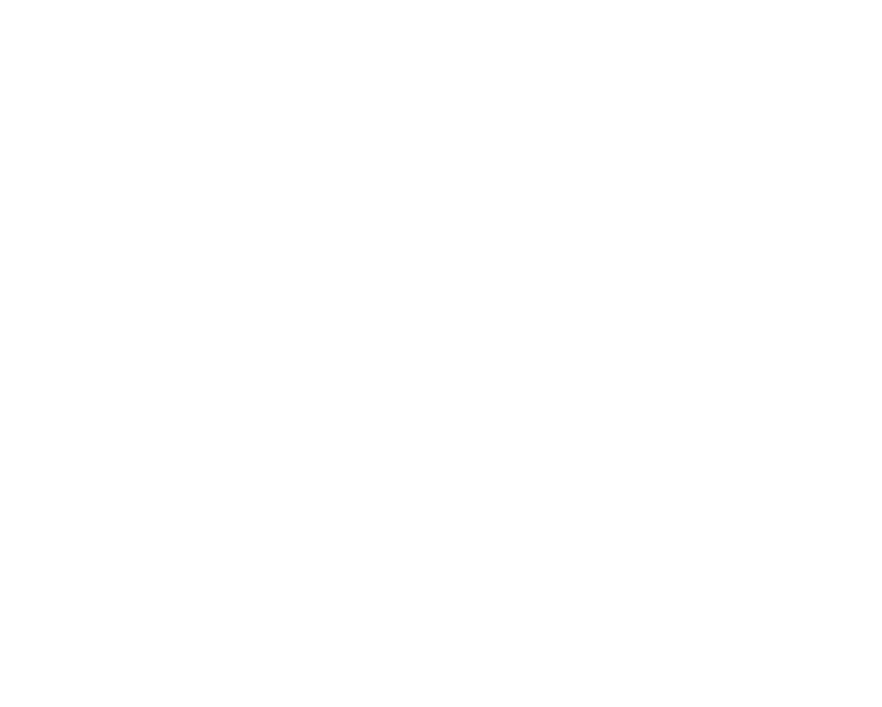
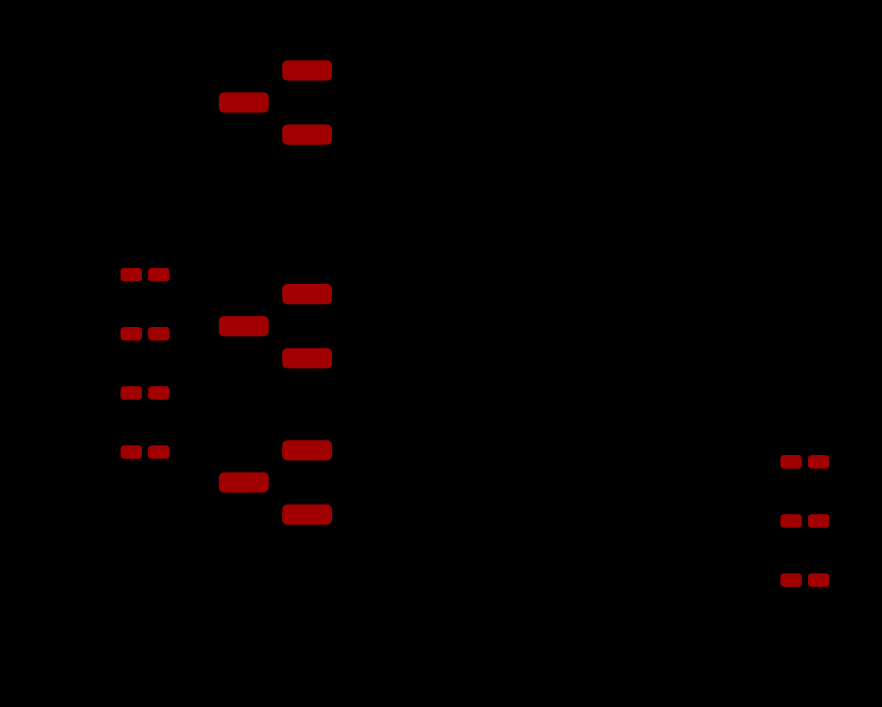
part: none -> (275, 102)
part: none -> (145, 274)
part: none -> (275, 326)
part: none -> (145, 333)
part: none -> (145, 392)
part: none -> (145, 452)
part: none -> (804, 461)
part: none -> (275, 482)
part: none -> (804, 520)
part: none -> (804, 580)

